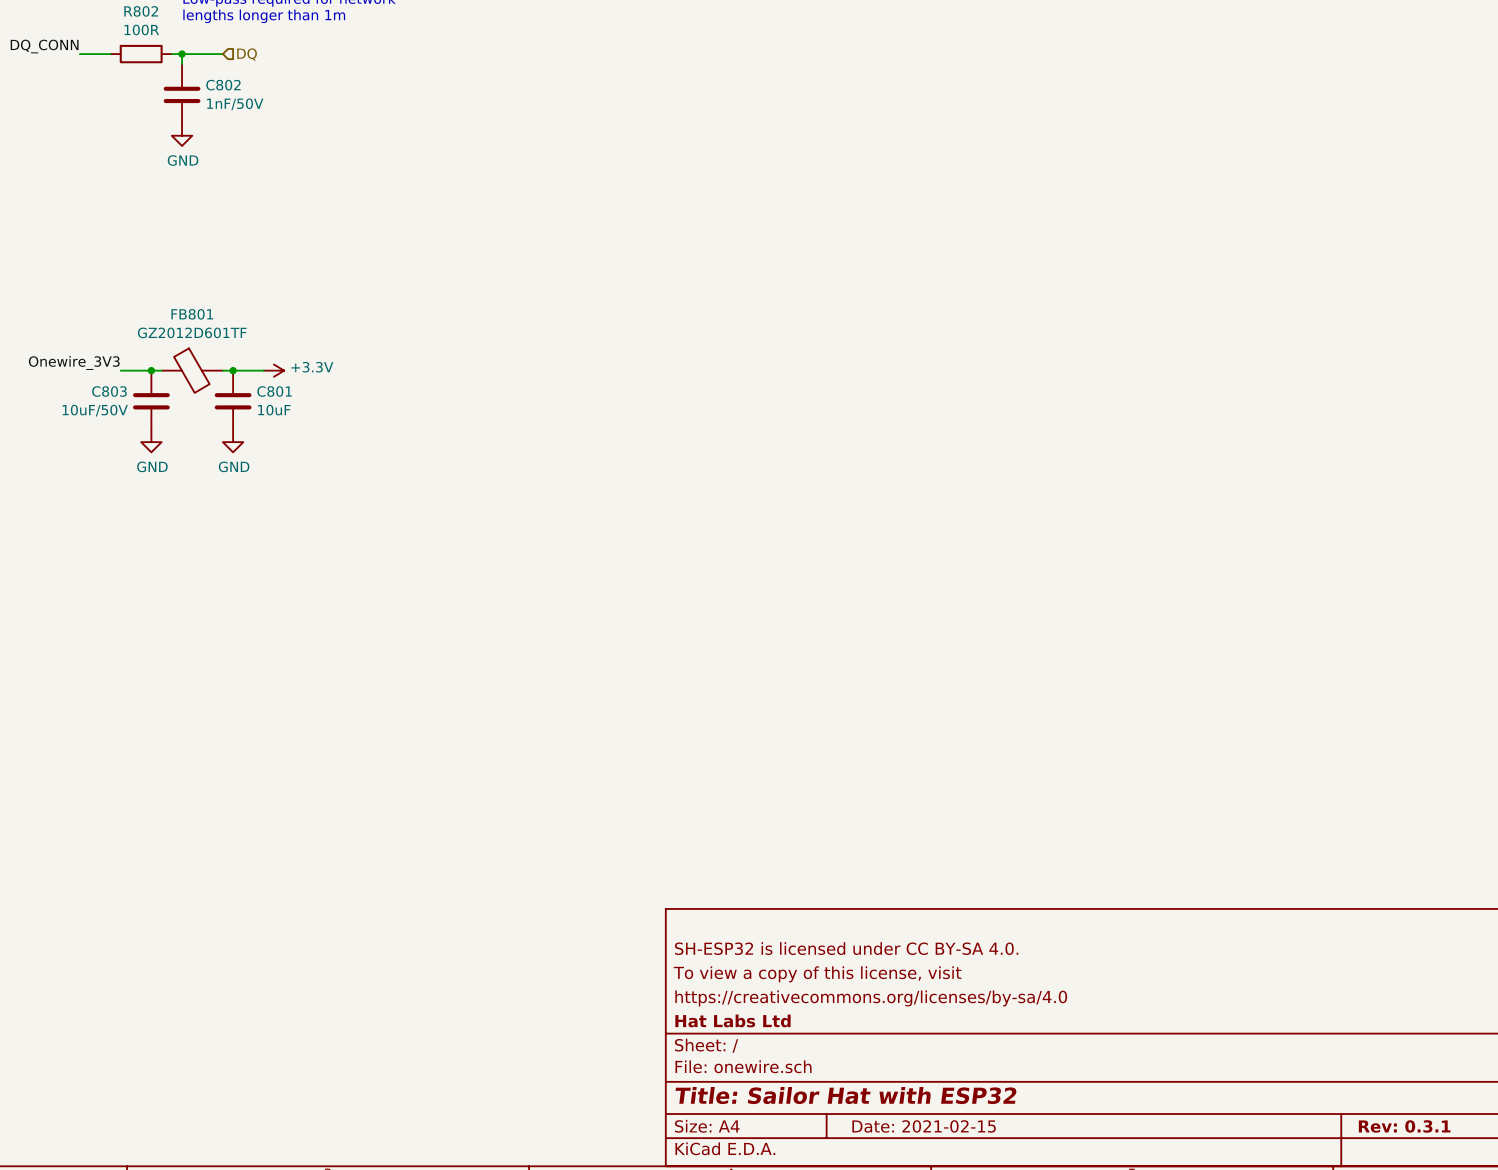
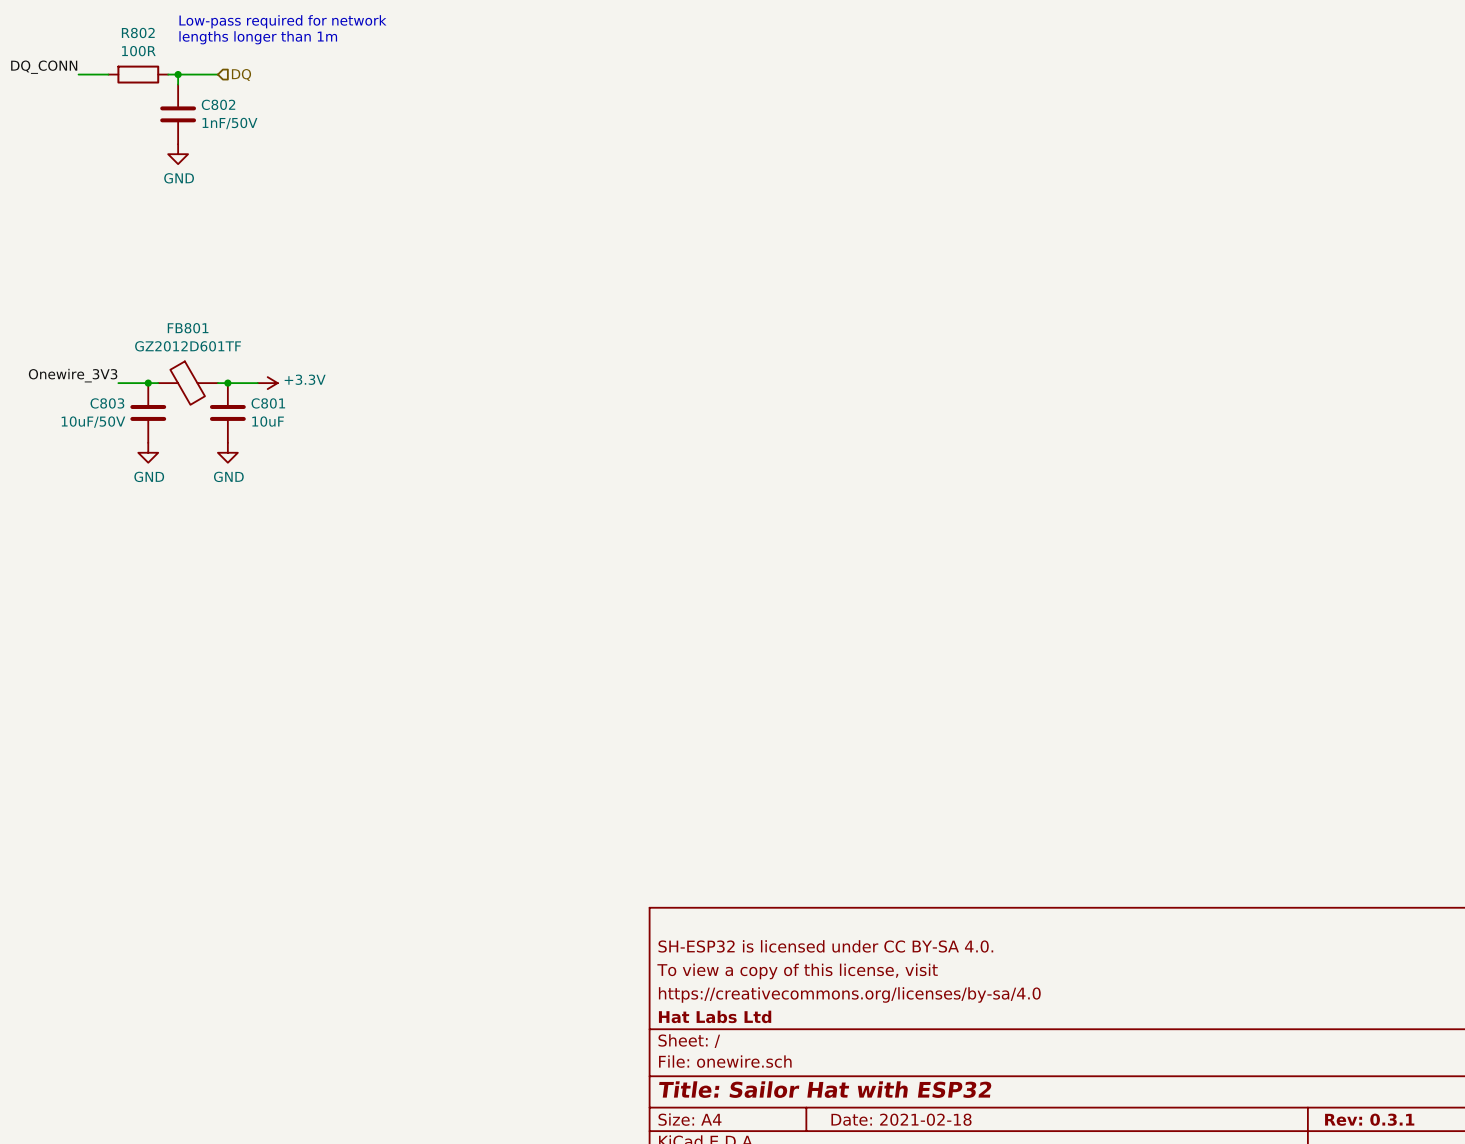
title block: Date: 2021-02-15 (924, 1126) -> Date: 2021-02-18 (901, 1119)

